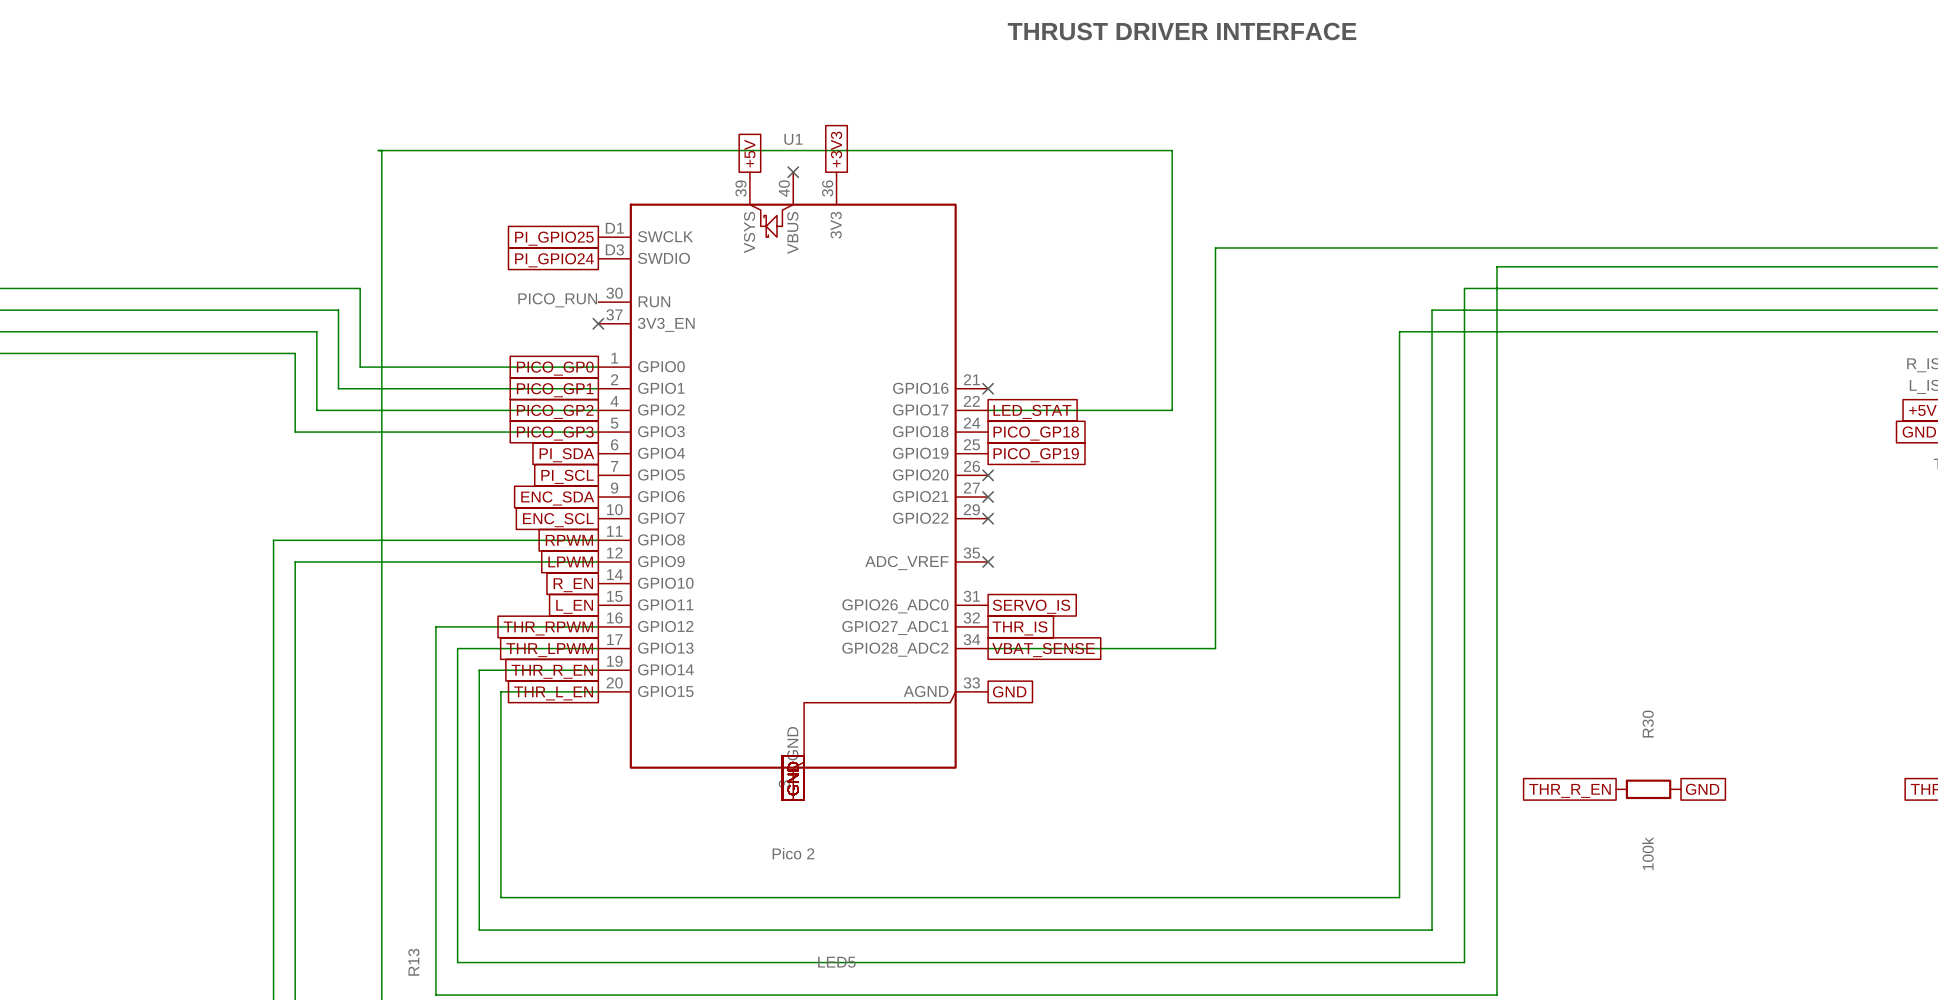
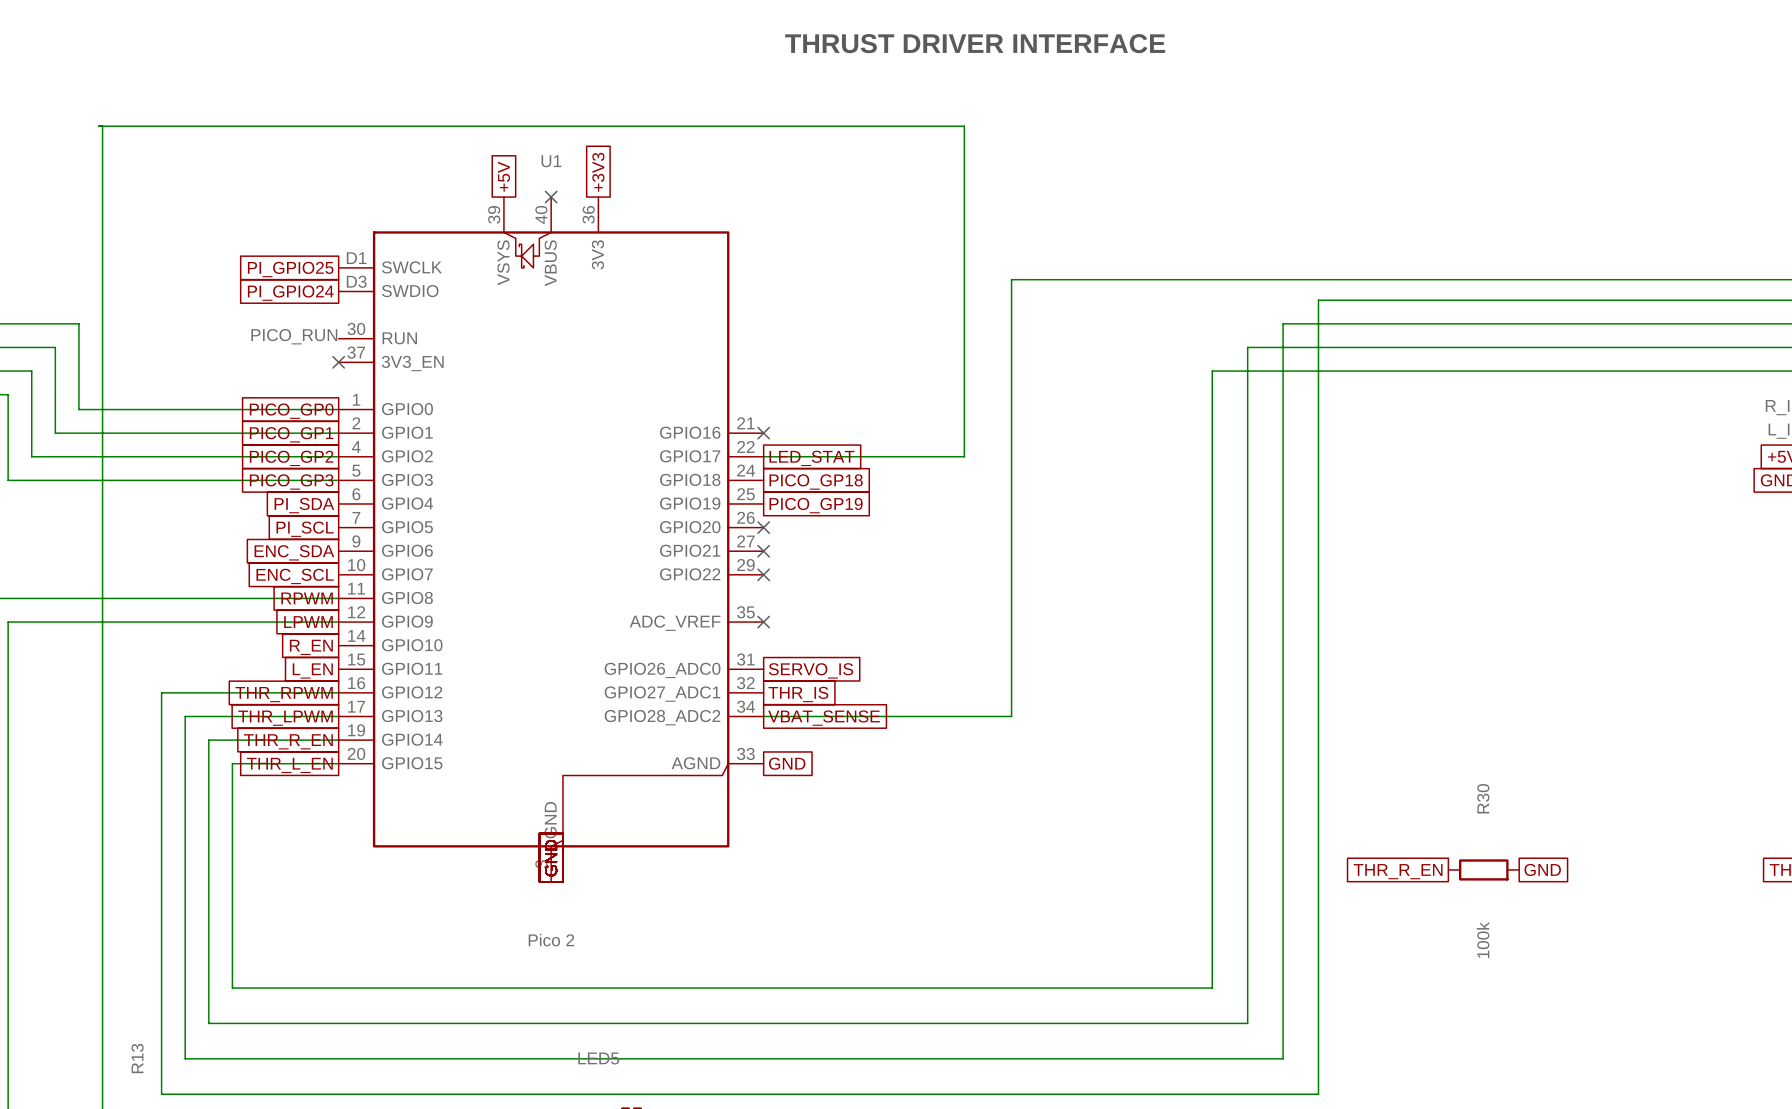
wire: none -> (102, 126) (102, 173)
wire: (378, 150) (1172, 150) -> (98, 126) (964, 126) (964, 173)

